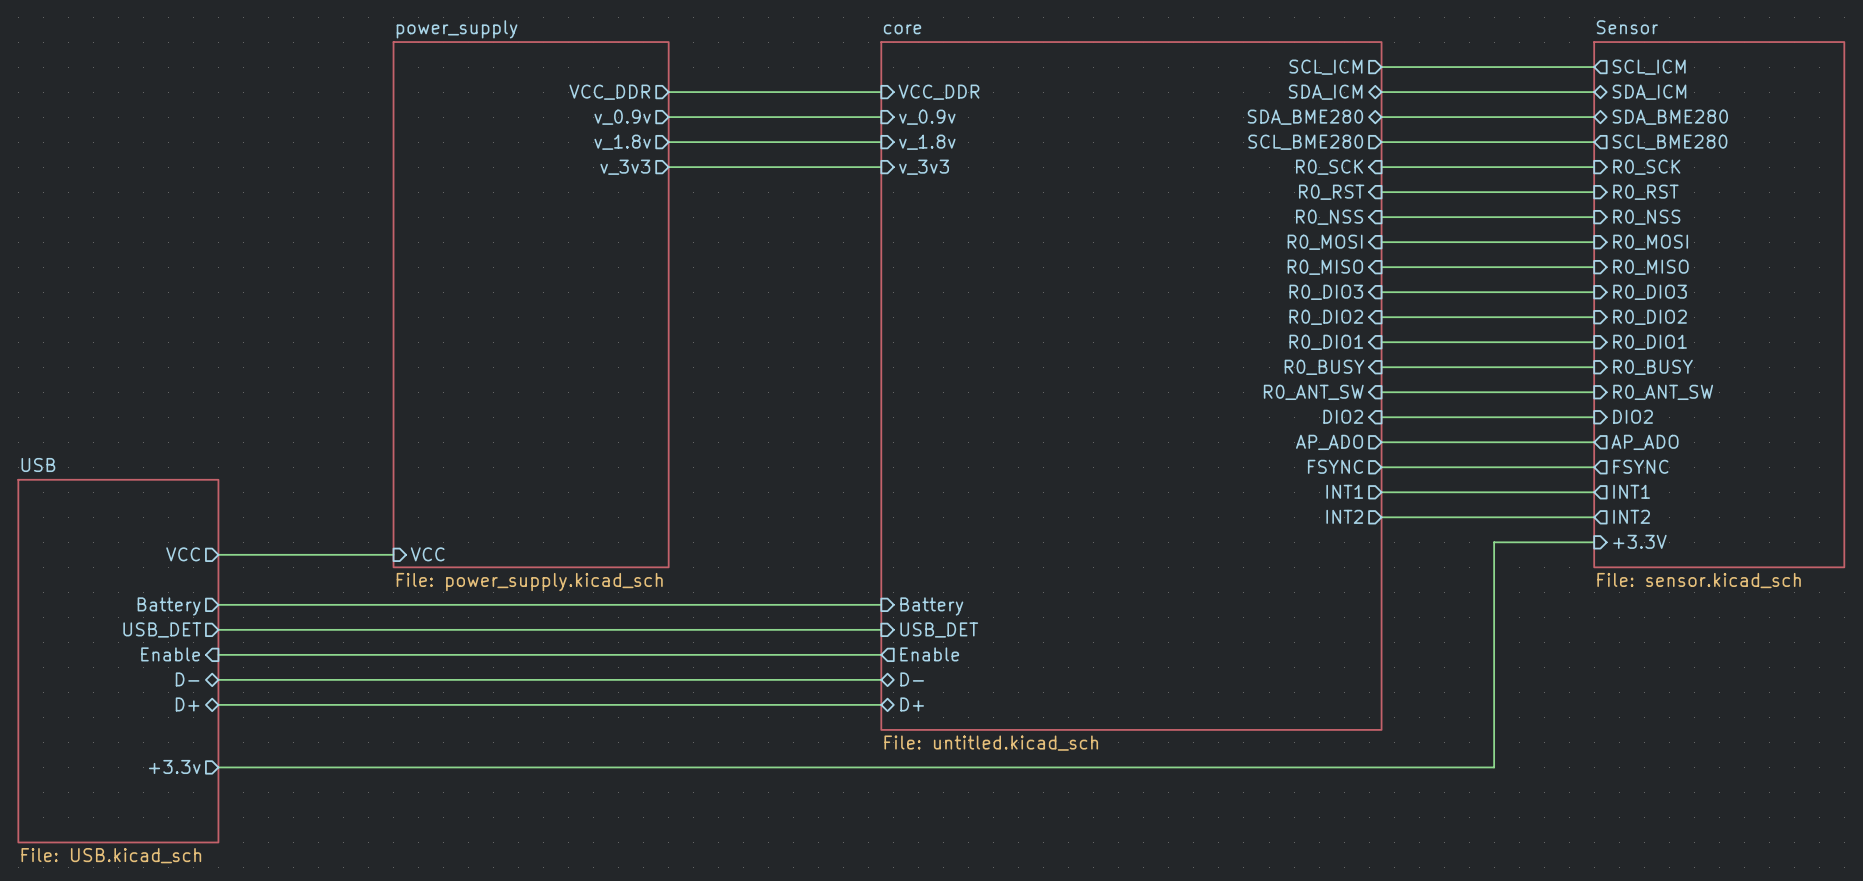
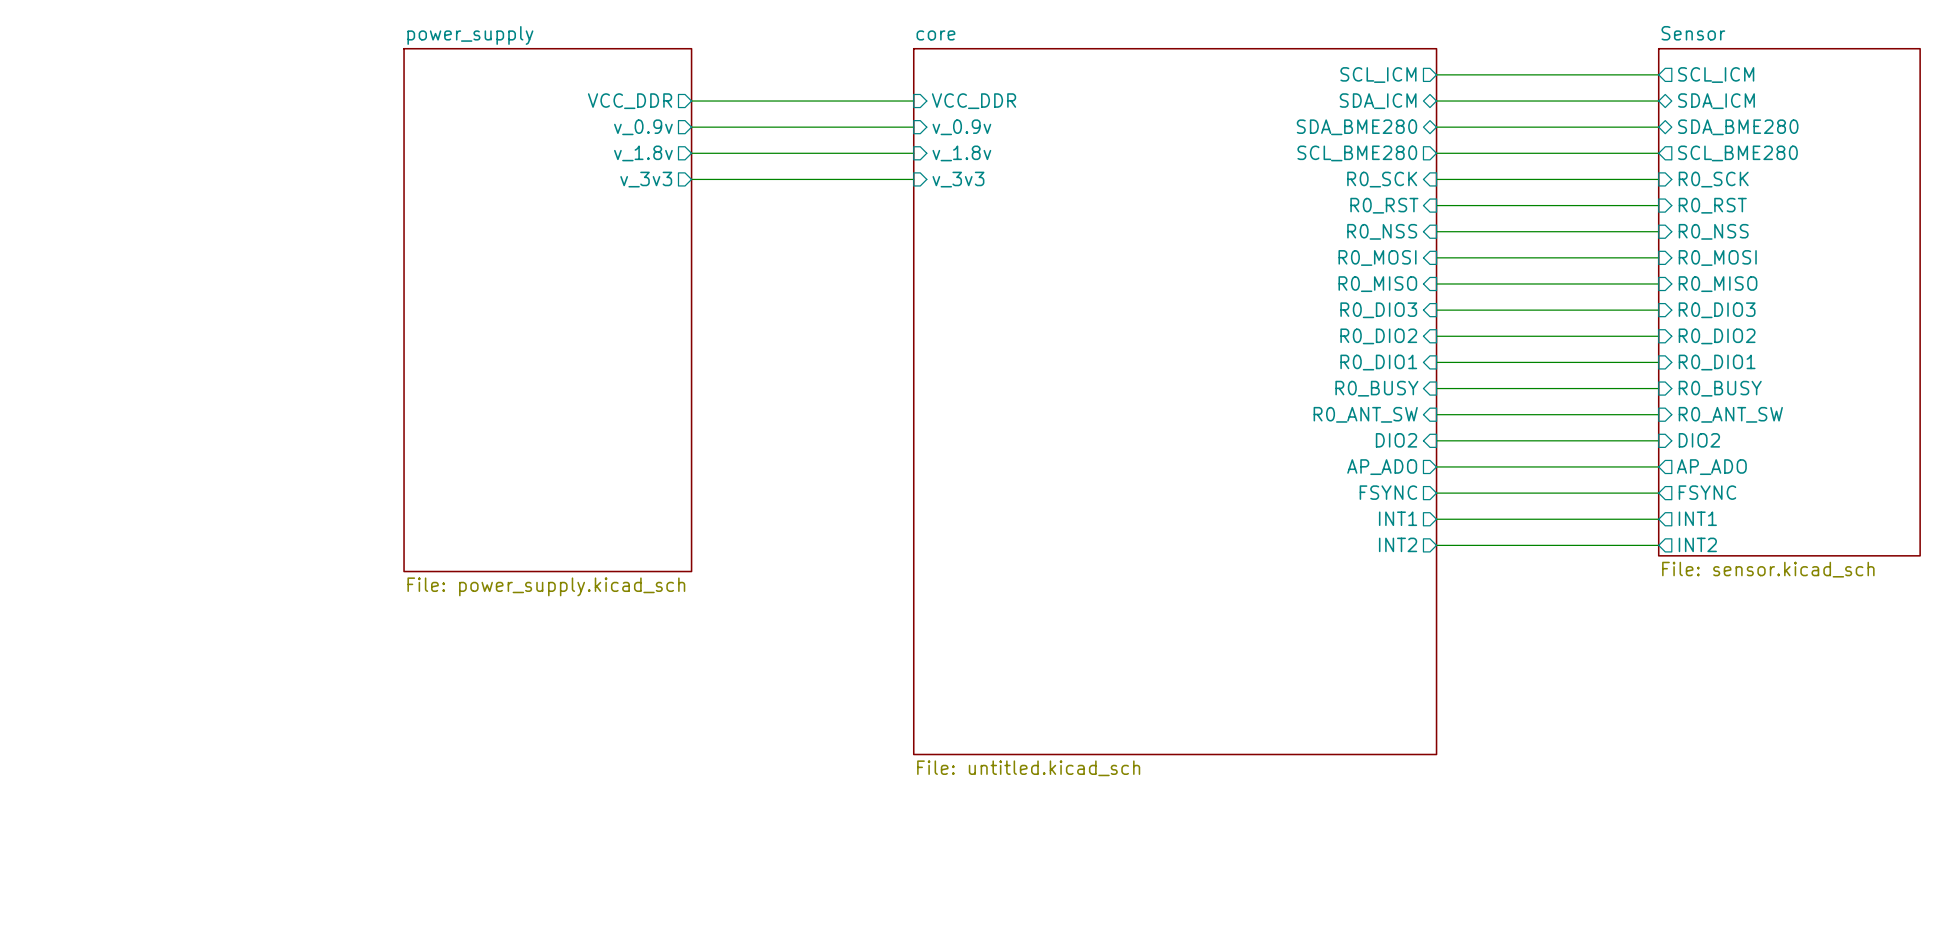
sheet core shape: [880, 41, 1383, 731] -> [912, 47, 1438, 756]
sheet Sensor: none -> File: sensor.kicad_sch (1789, 302)
sheet power_supply: none -> File: power_supply.kicad_sch (547, 310)
sheet power_supply: File: power_supply.kicad_sch (531, 304) -> none
sheet Sensor: File: sensor.kicad_sch (1719, 304) -> none
sheet pin: +3.3V (1639, 541) -> none
wire: (1594, 542) (1494, 542) (1494, 767) (218, 767) -> none
sheet pin: VCC (183, 554) -> none
wire: (218, 554) (393, 554) -> none
sheet pin: VCC (427, 554) -> none
wire: (218, 604) (881, 604) -> none
sheet pin: Battery (169, 606) -> none
sheet pin: Battery (931, 606) -> none
sheet pin: USB_DET (162, 629) -> none
wire: (218, 629) (881, 629) -> none
sheet pin: USB_DET (939, 629) -> none
sheet pin: Enable (170, 654) -> none
wire: (218, 654) (881, 654) -> none
sheet pin: Enable (929, 654) -> none
sheet USB: File: USB.kicad_sch (118, 661) -> none
sheet pin: D- (187, 679) -> none
wire: (218, 679) (881, 679) -> none
sheet pin: D- (912, 679) -> none
sheet pin: D+ (187, 704) -> none
wire: (218, 704) (881, 704) -> none
sheet pin: D+ (912, 704) -> none
sheet pin: +3.3v (174, 766) -> none

